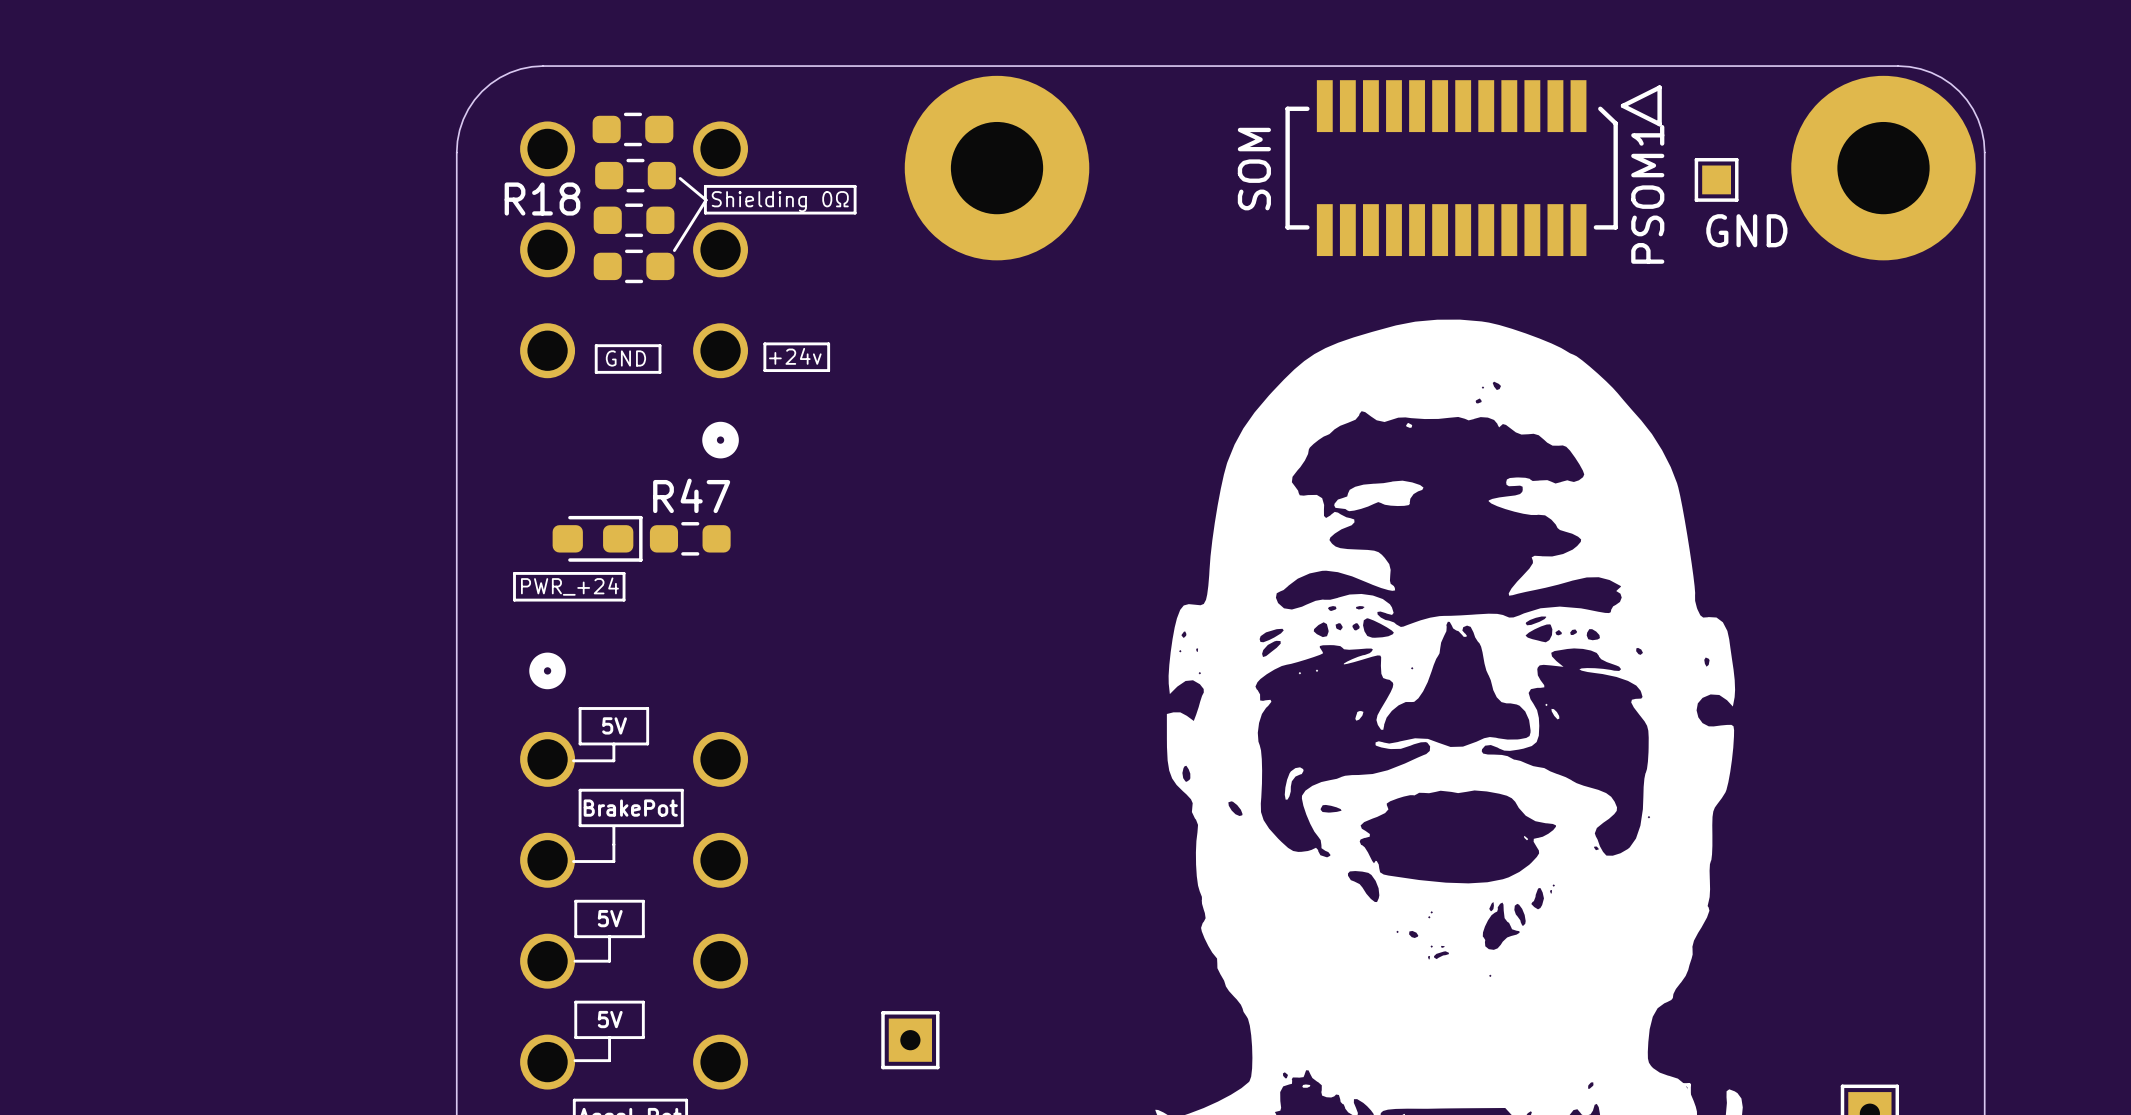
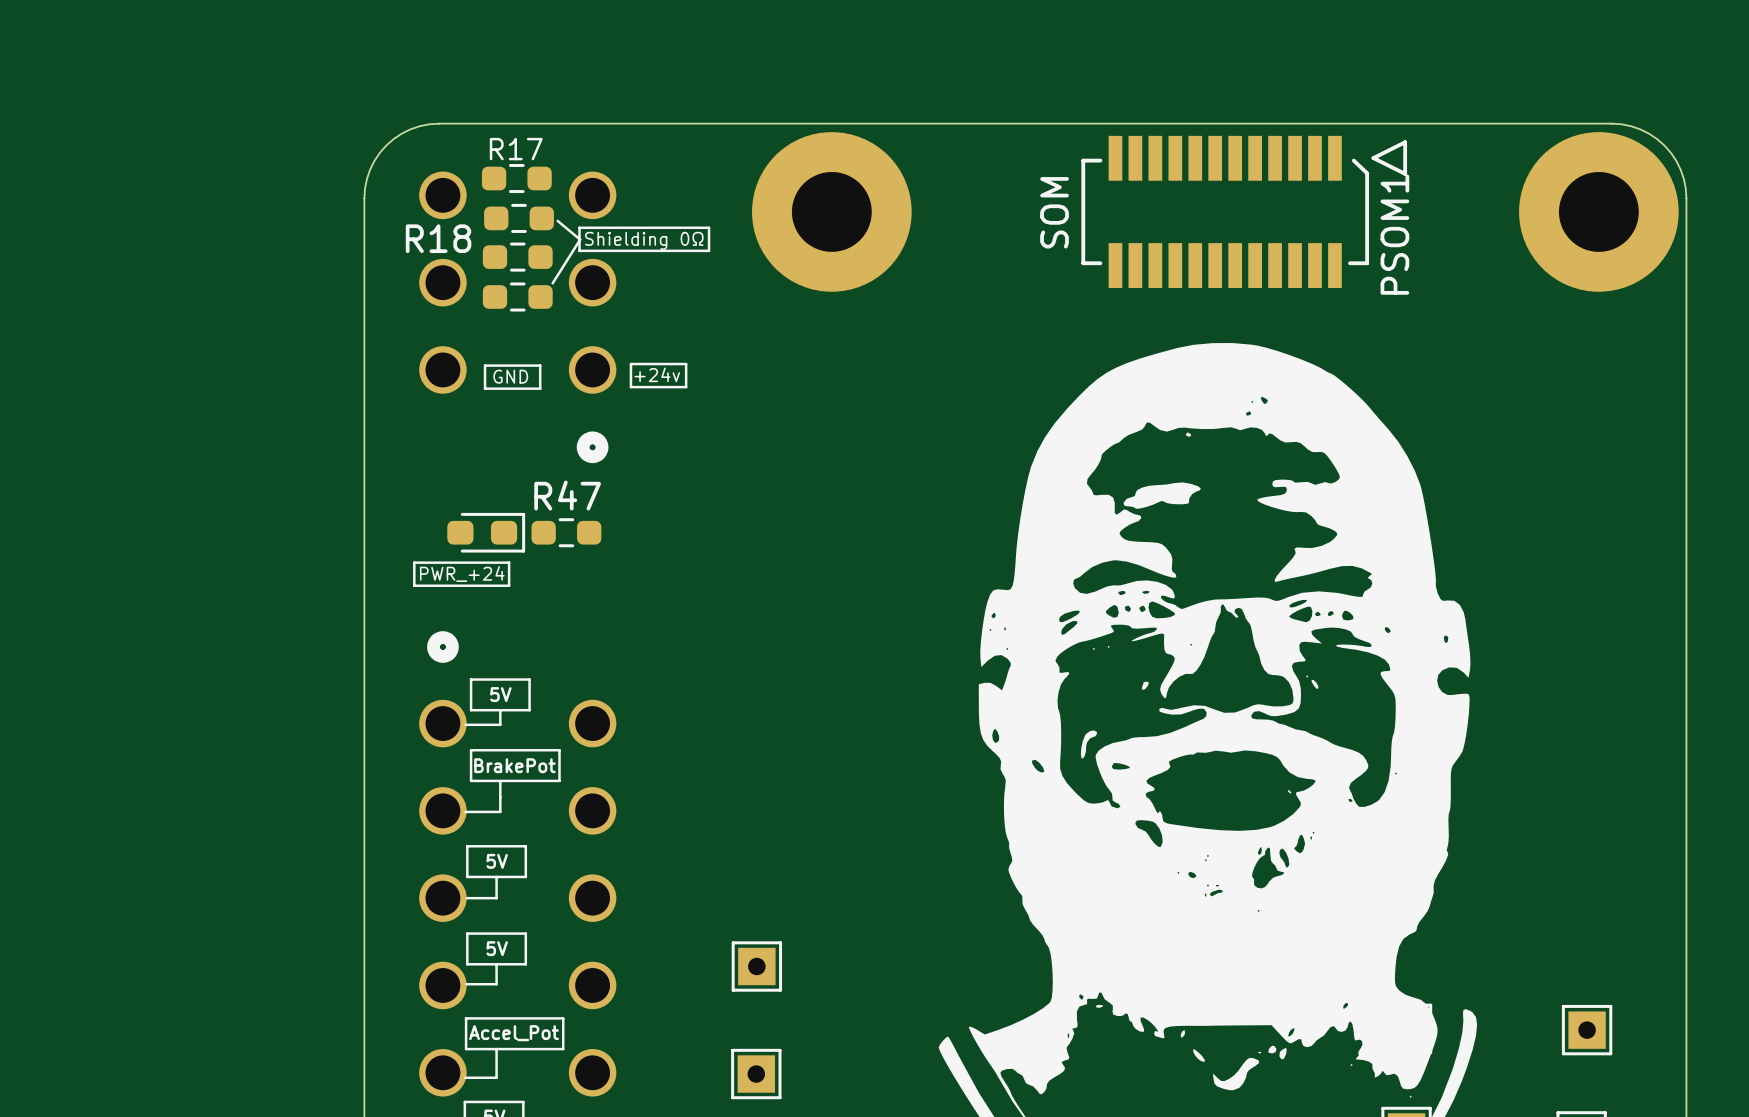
GND: (1716, 179) -> none
Shielding 0Ω name: Shielding 0Ω (780, 201) -> R17 (516, 149)

